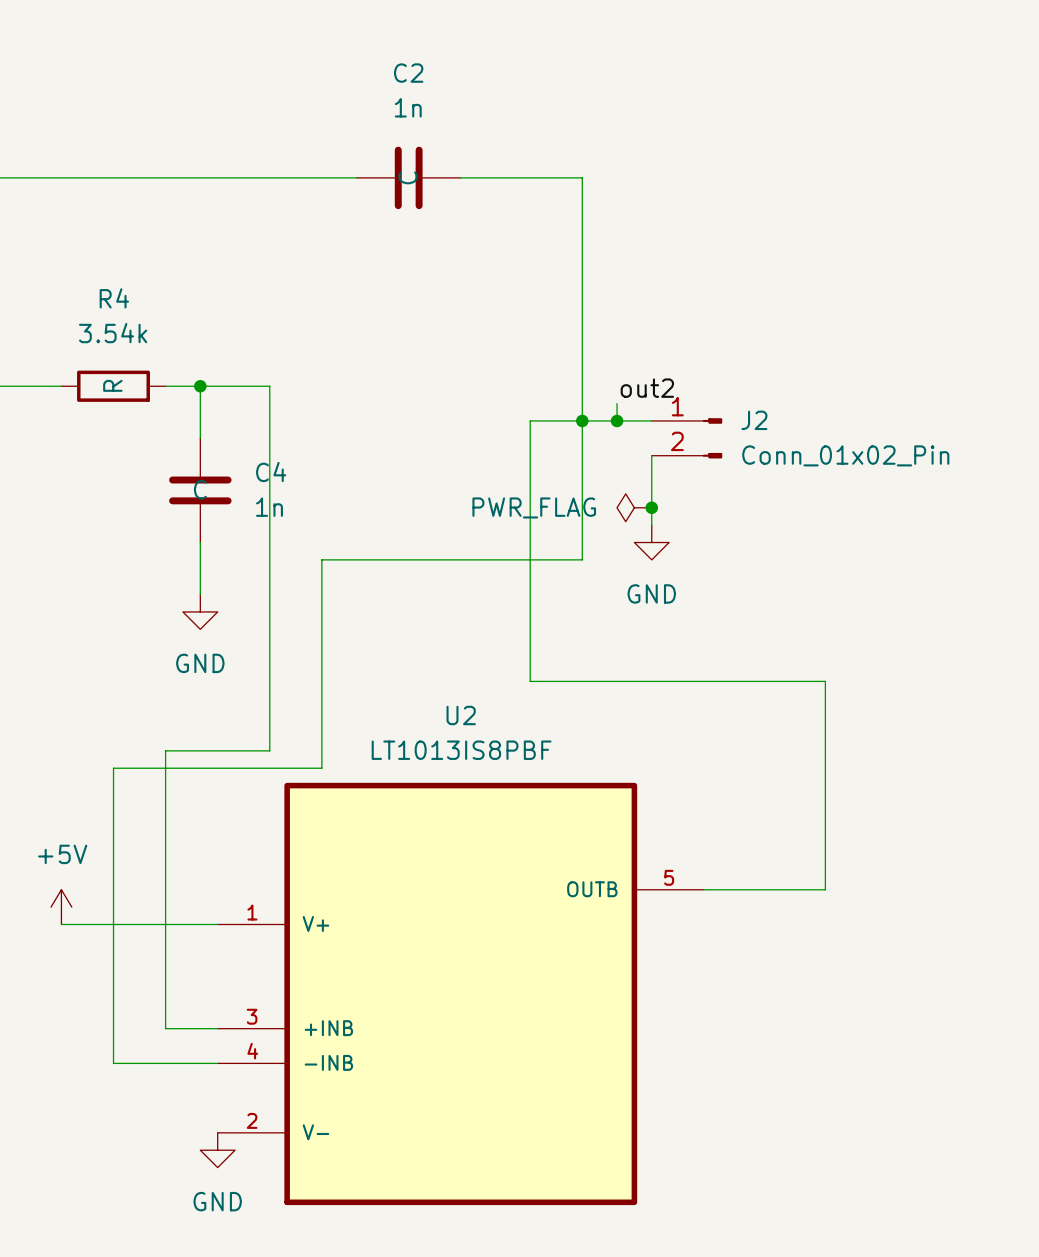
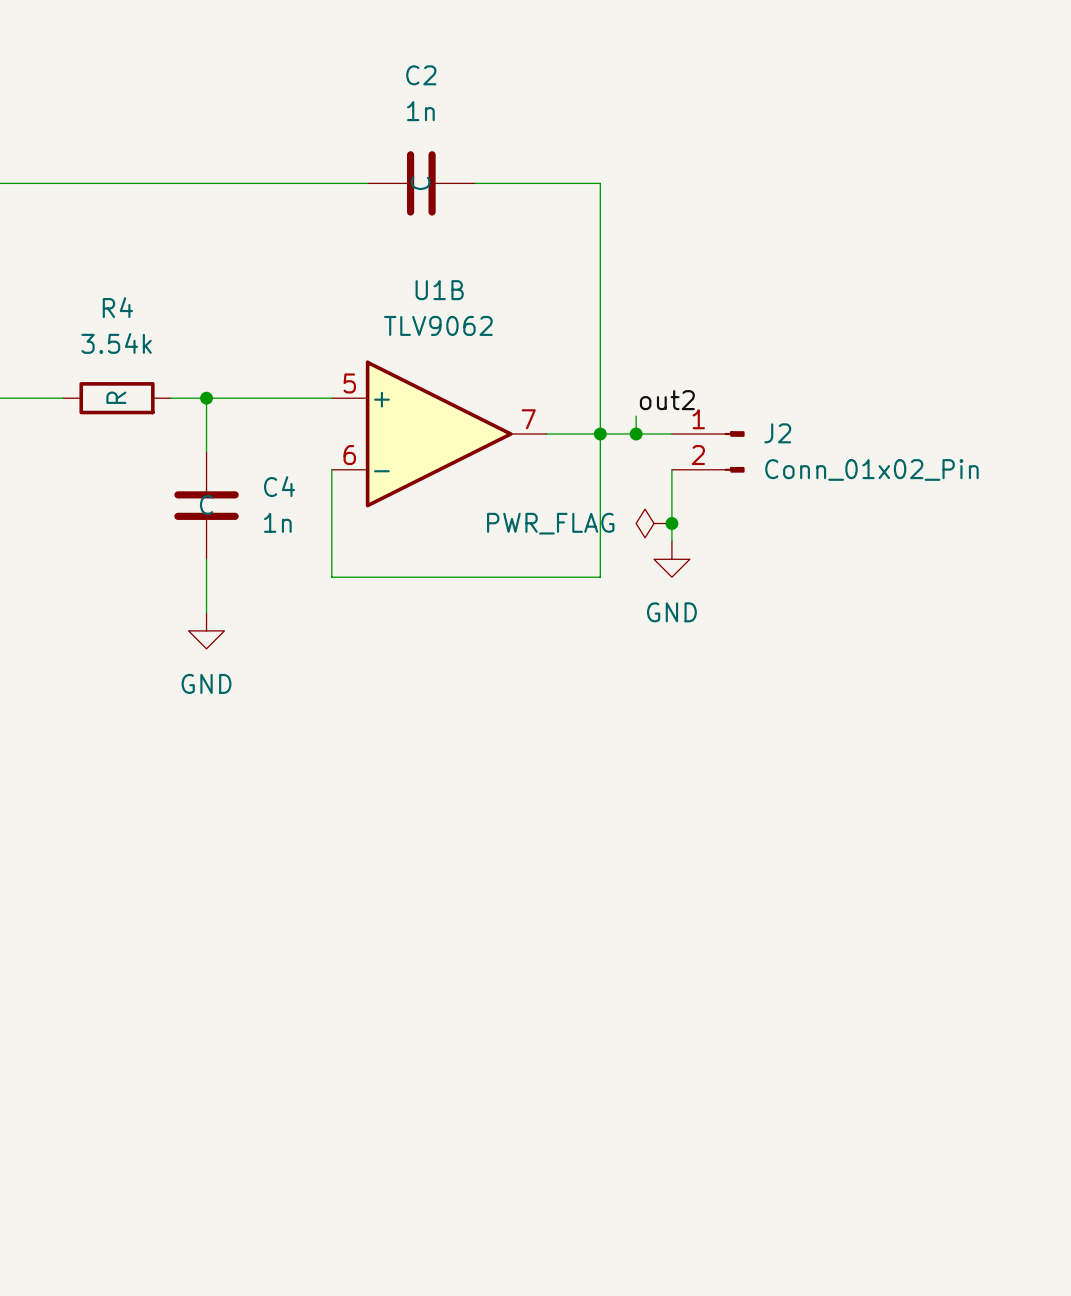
wire: (269, 386) (269, 750) (165, 750) (165, 1028) (217, 1028) -> (278, 398) (331, 398)
U1B: none -> TLV9062 (439, 434)
wire: (530, 420) (530, 681) (825, 681) (825, 889) (703, 889) -> none
wire: (321, 559) (321, 768) (113, 768) (113, 1063) (217, 1063) -> (331, 577) (331, 469)
power symbol: +5V (61, 907) -> none
wire: (61, 924) (217, 924) -> none
U2: LT1013IS8PBF (460, 993) -> none
power symbol: GND (217, 1150) -> none

